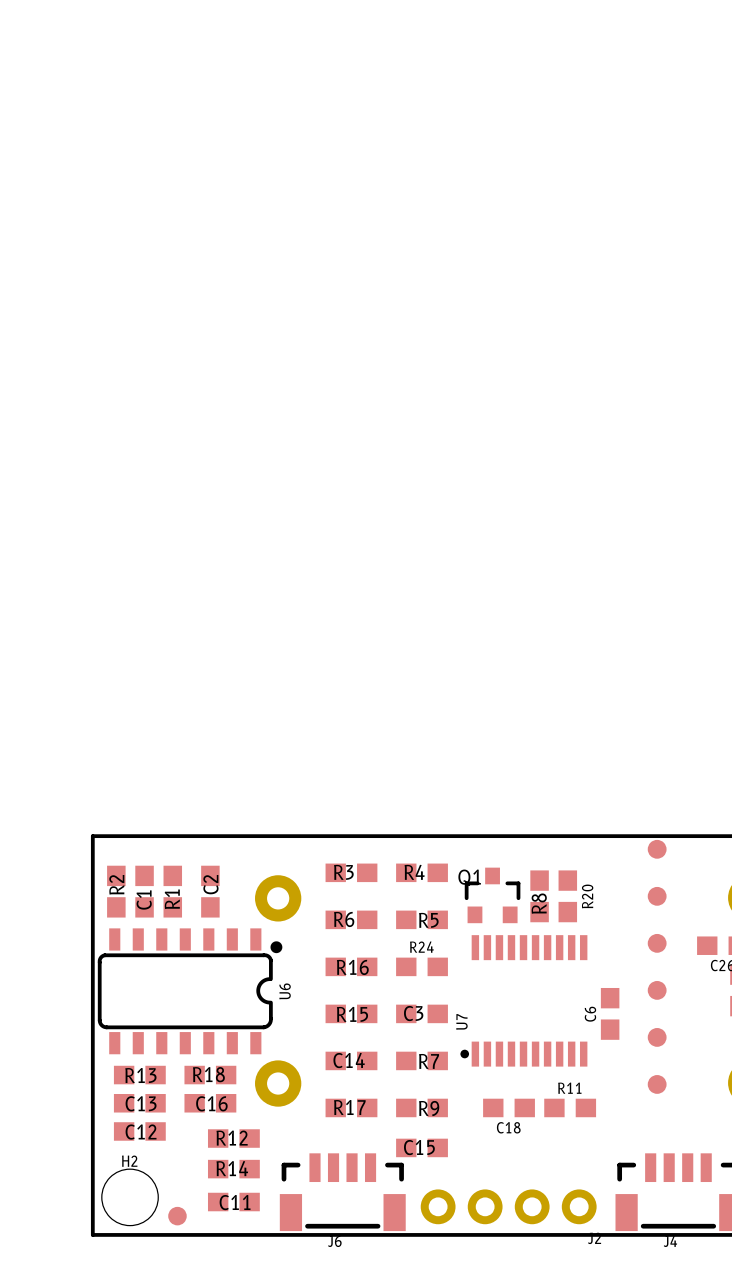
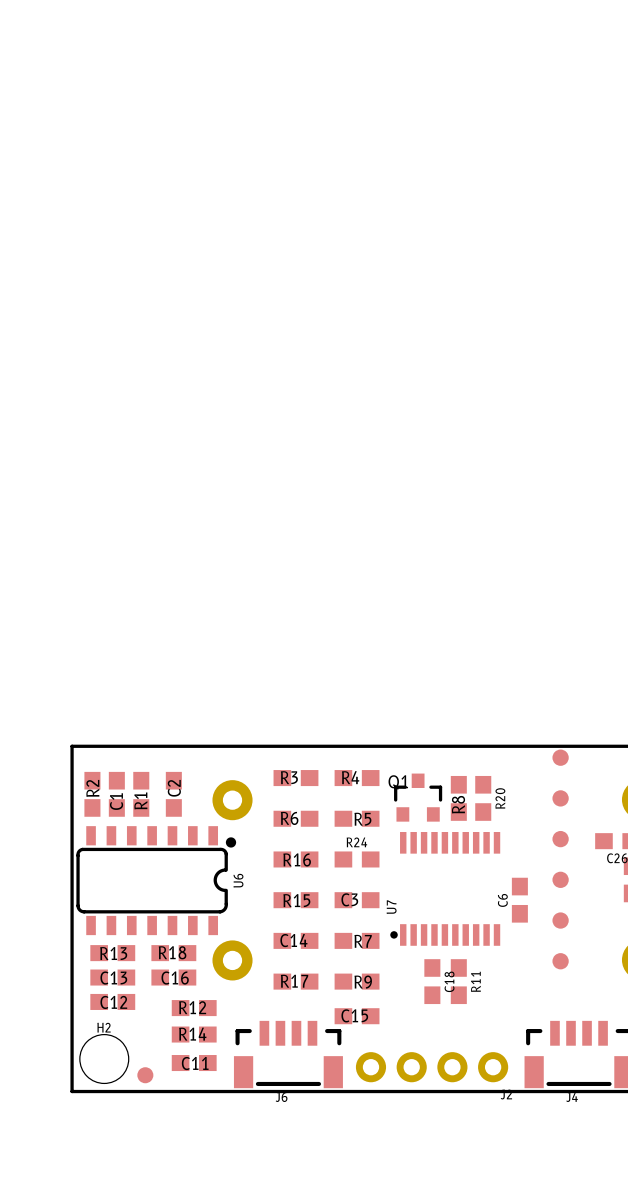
C18 rotation: 0° (509, 1107) -> 90° clockwise (432, 981)
R11 rotation: 0° (570, 1107) -> 90° clockwise (458, 981)

